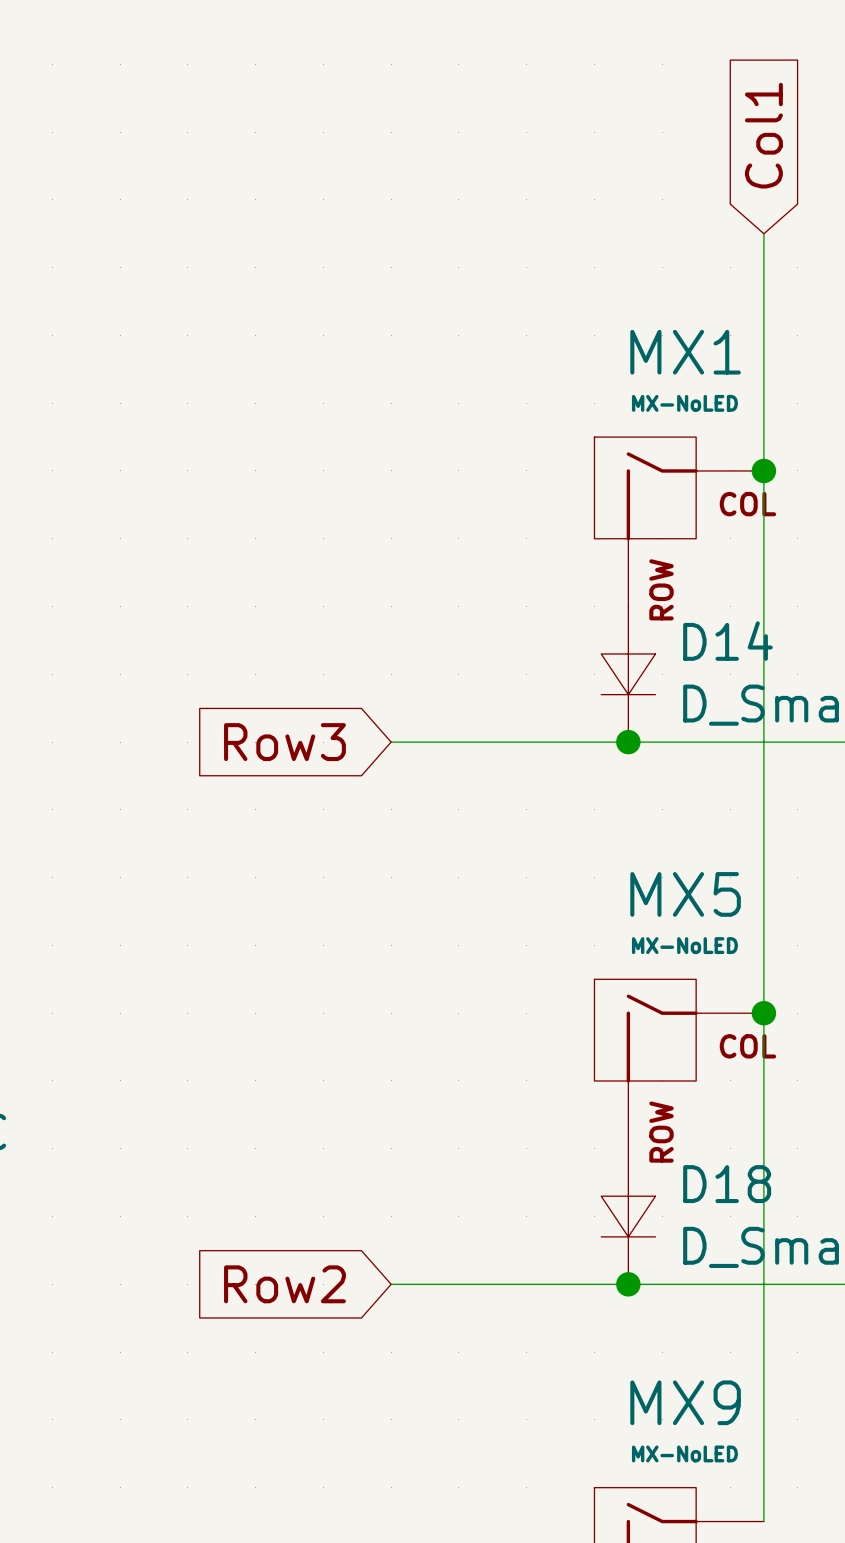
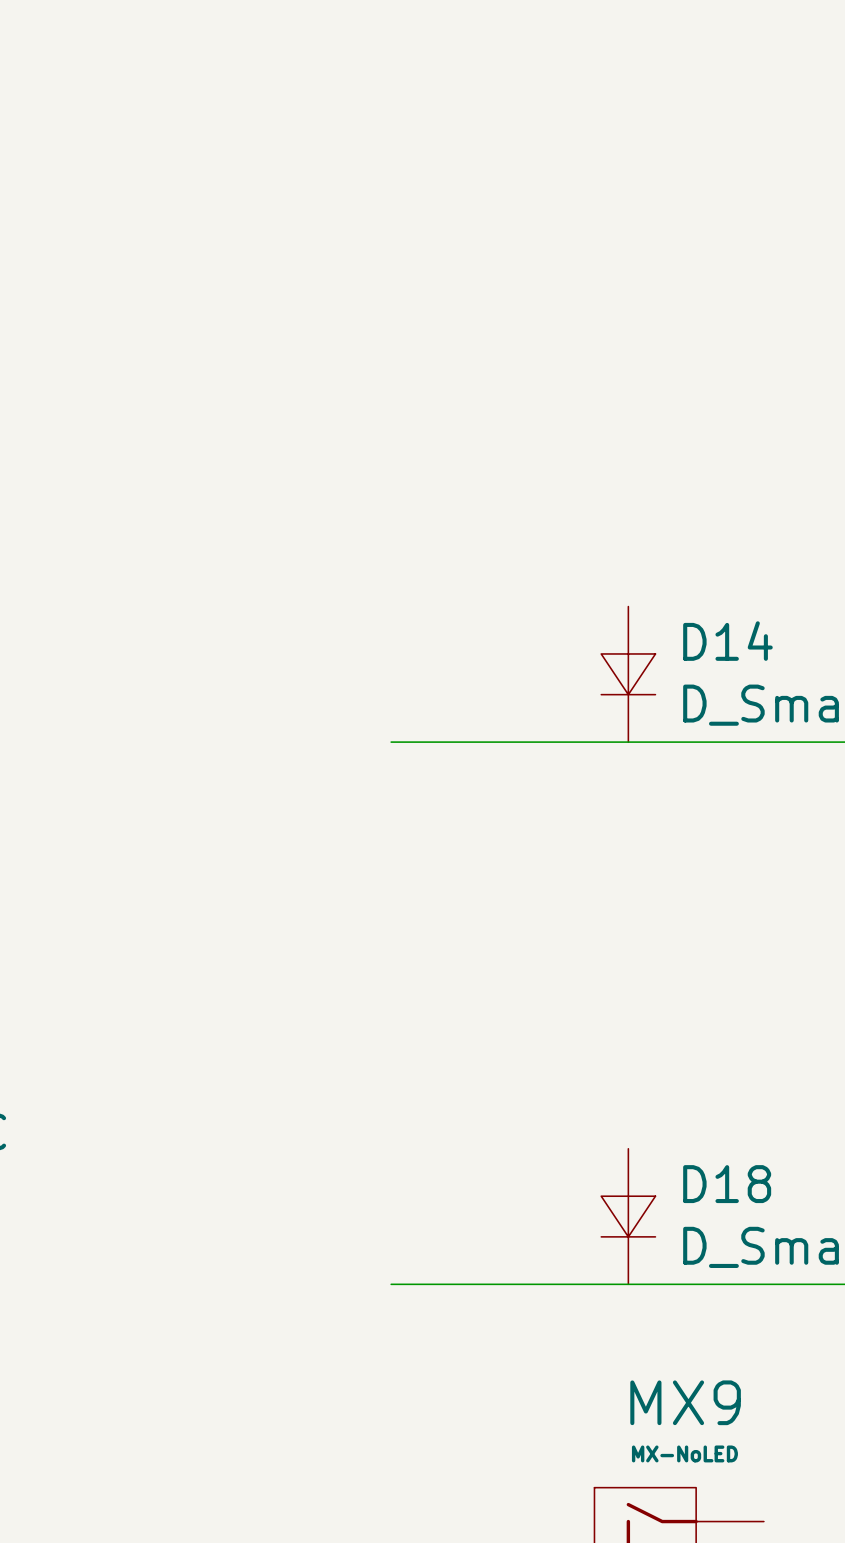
global label: Col1 (763, 135) -> none
wire: (763, 233) (763, 1521) -> none
junction: (763, 470) -> none
MX1: MX-NoLED (679, 521) -> none
global label: Row3 (284, 742) -> none
junction: (628, 742) -> none
junction: (763, 1013) -> none
MX5: MX-NoLED (679, 1064) -> none
global label: Row2 (284, 1284) -> none
junction: (628, 1284) -> none

